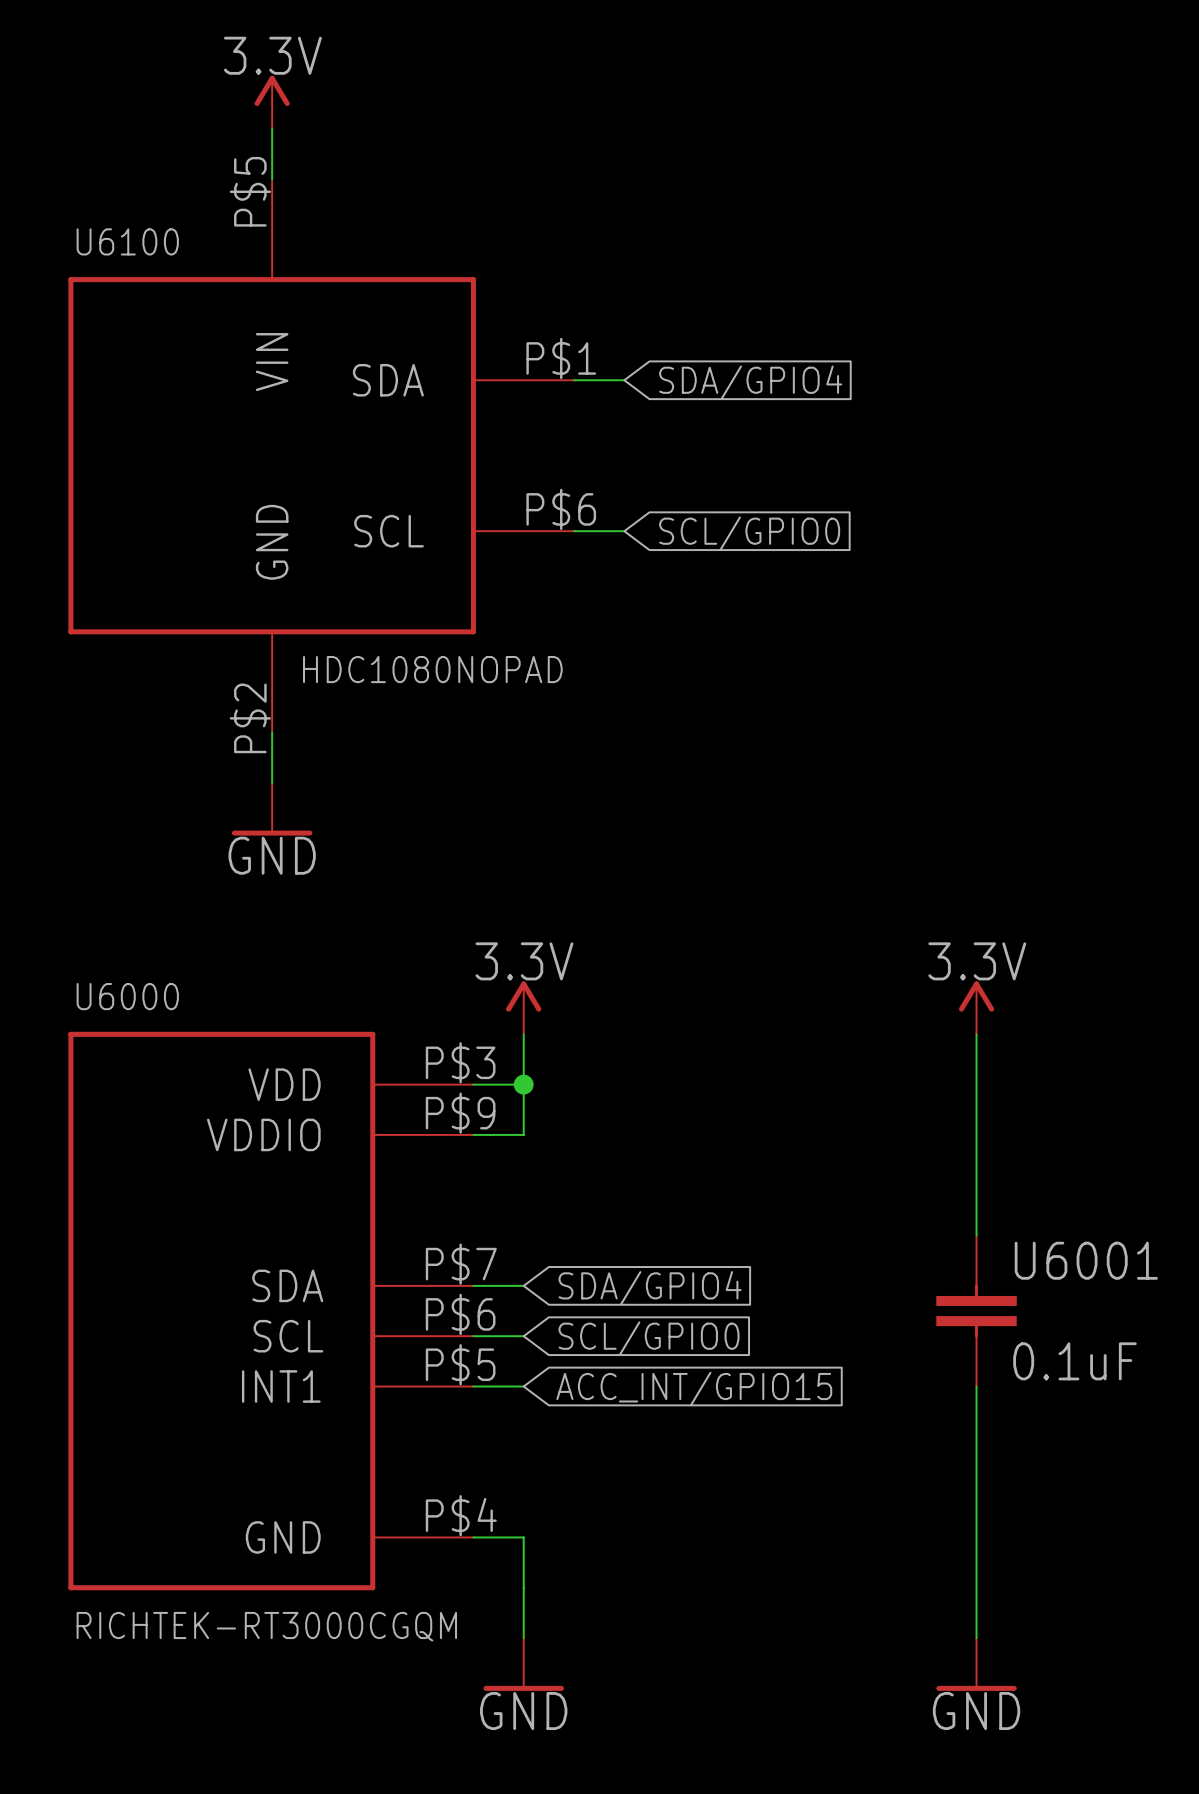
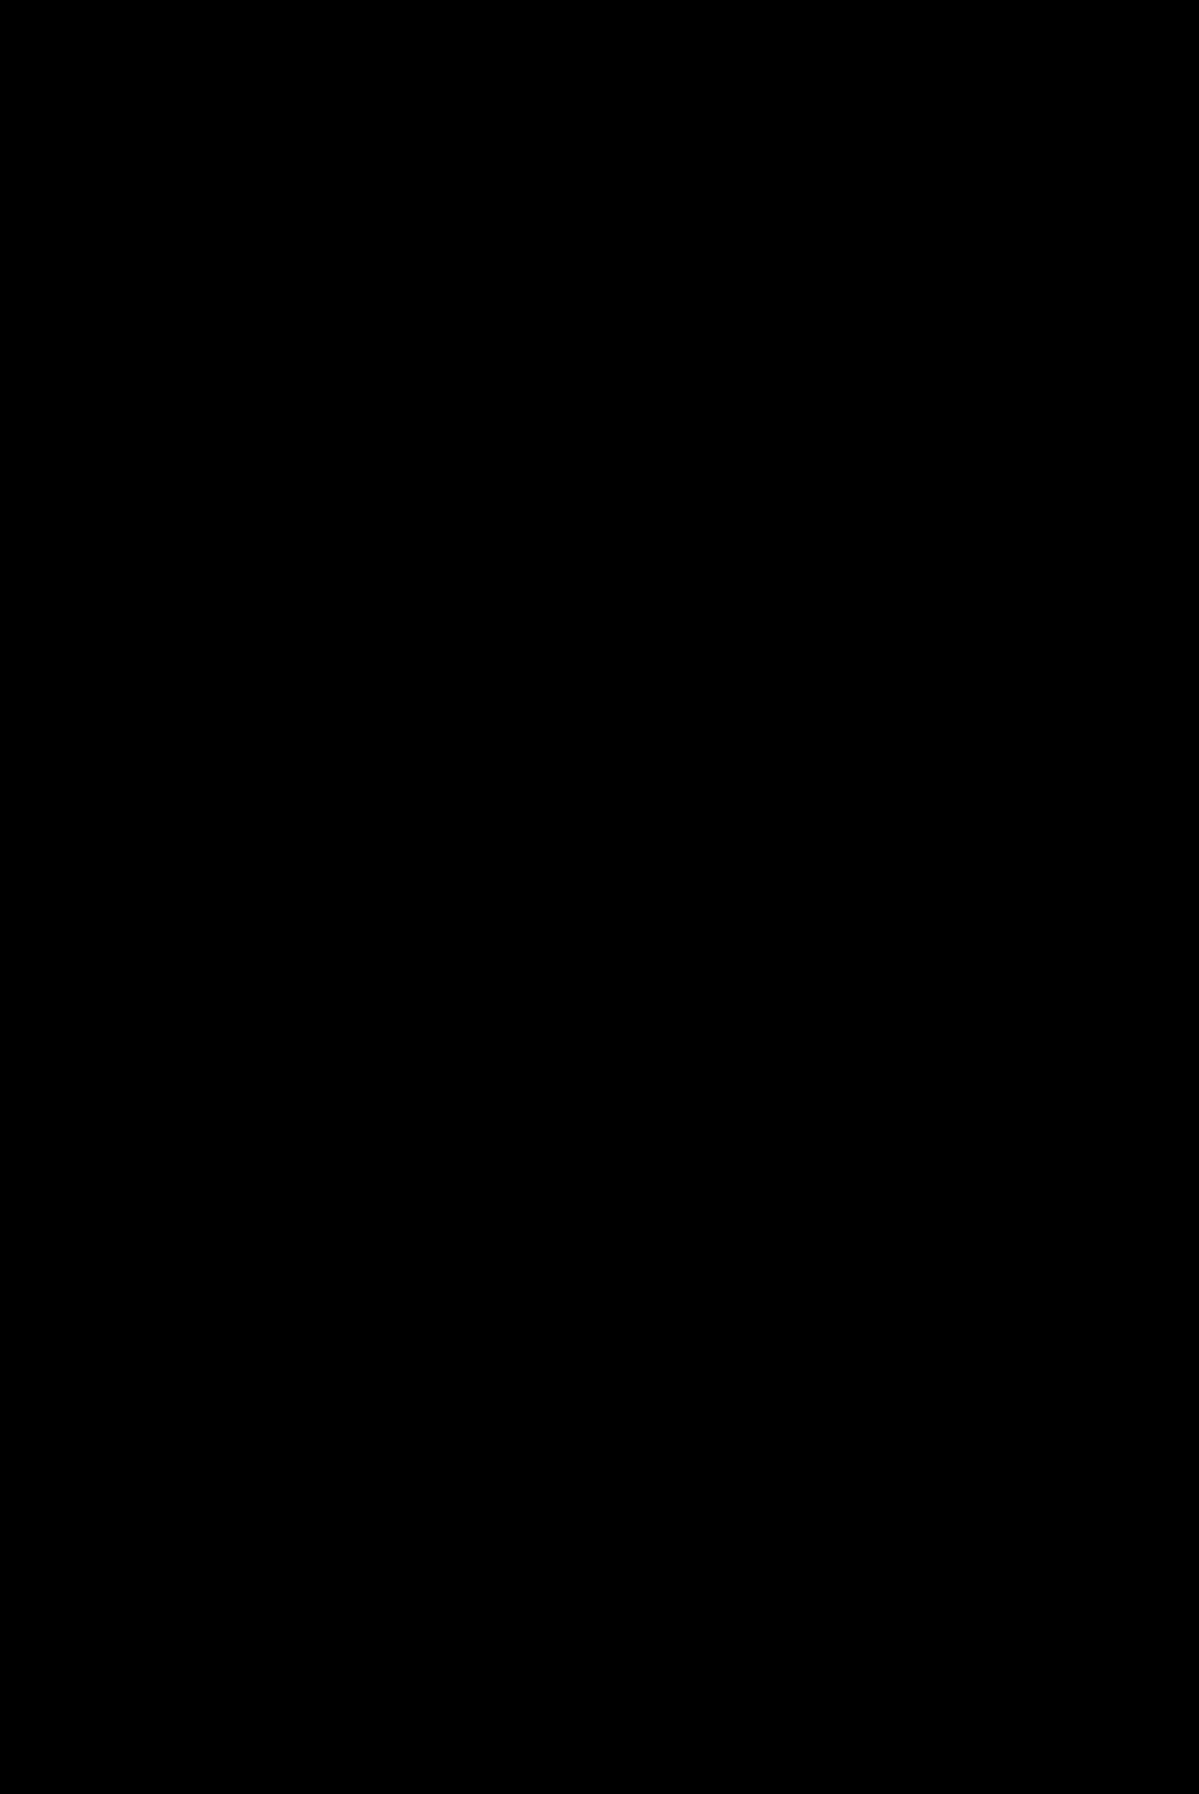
power symbol: 3.3V (272, 102) -> none
wire: (272, 128) (272, 179) -> none
wire: (574, 380) (624, 380) -> none
global label: SDA/GPIO4 (750, 382) -> none
U6100: HDC1080NOPAD (321, 455) -> none
wire: (574, 531) (624, 531) -> none
global label: SCL/GPIO0 (749, 533) -> none
wire: (272, 732) (272, 782) -> none
power symbol: GND (272, 809) -> none
power symbol: 3.3V (523, 1007) -> none
power symbol: 3.3V (976, 1007) -> none
wire: (523, 1034) (523, 1134) (473, 1134) -> none
wire: (976, 1034) (976, 1235) -> none
wire: (473, 1084) (523, 1084) -> none
junction: (523, 1084) -> none
wire: (473, 1285) (523, 1285) -> none
global label: SDA/GPIO4 (650, 1288) -> none
U6000: RICHTEK-RT3000CGQM (270, 1311) -> none
U6001: 0.1uF (976, 1311) -> none
wire: (473, 1336) (523, 1336) -> none
global label: SCL/GPIO0 (649, 1338) -> none
wire: (473, 1386) (523, 1386) -> none
wire: (976, 1386) (976, 1638) -> none
global label: ACC_INT/GPIO15 (694, 1388) -> none
wire: (473, 1537) (523, 1537) (523, 1638) -> none
power symbol: GND (523, 1664) -> none
power symbol: GND (976, 1664) -> none

